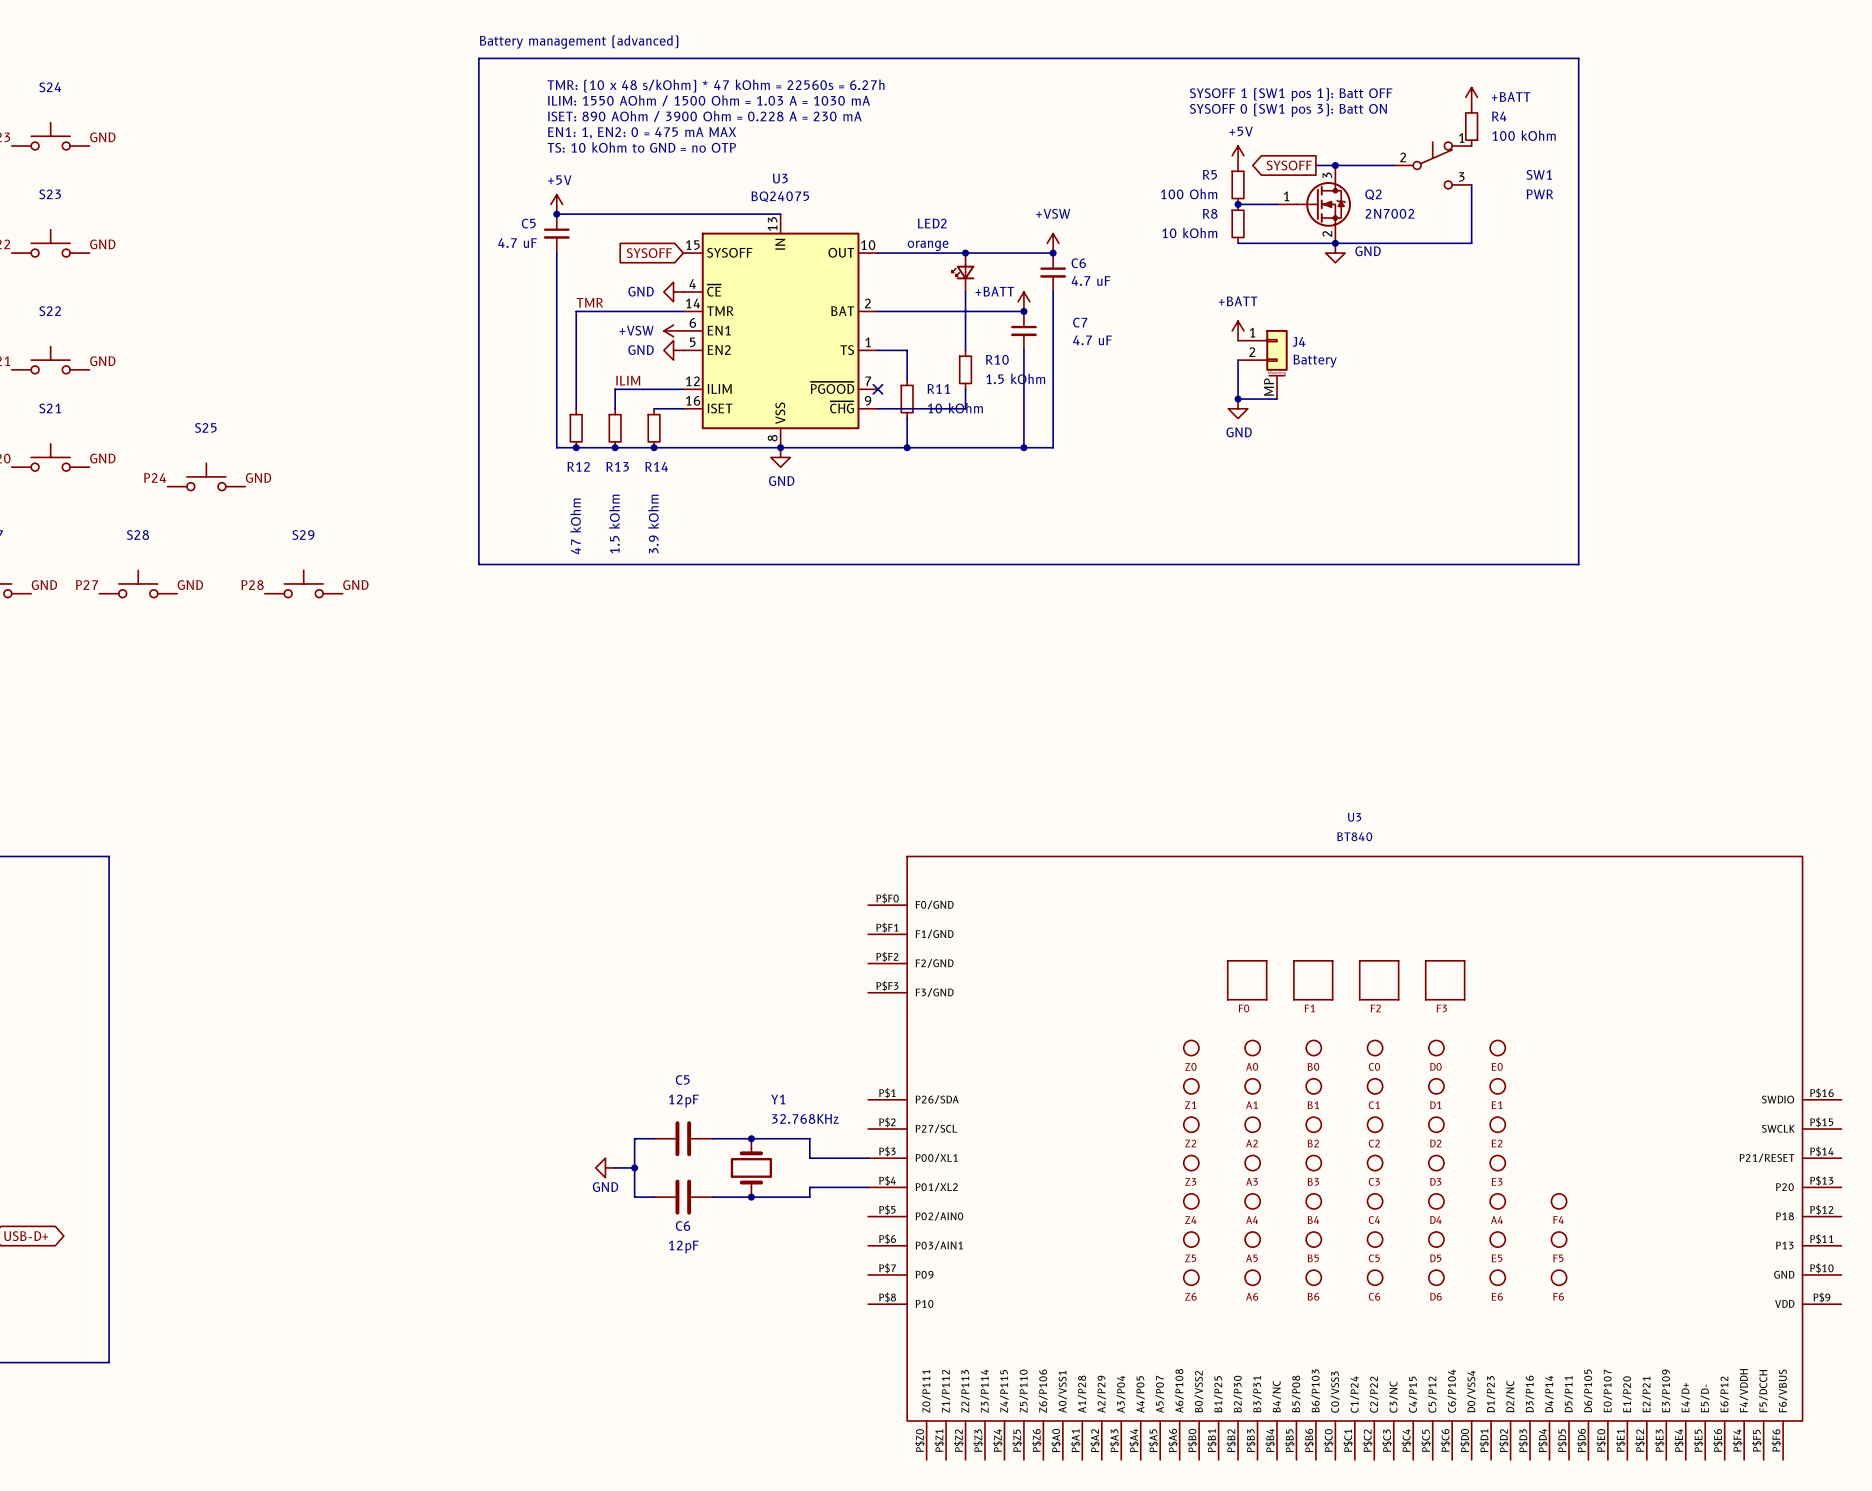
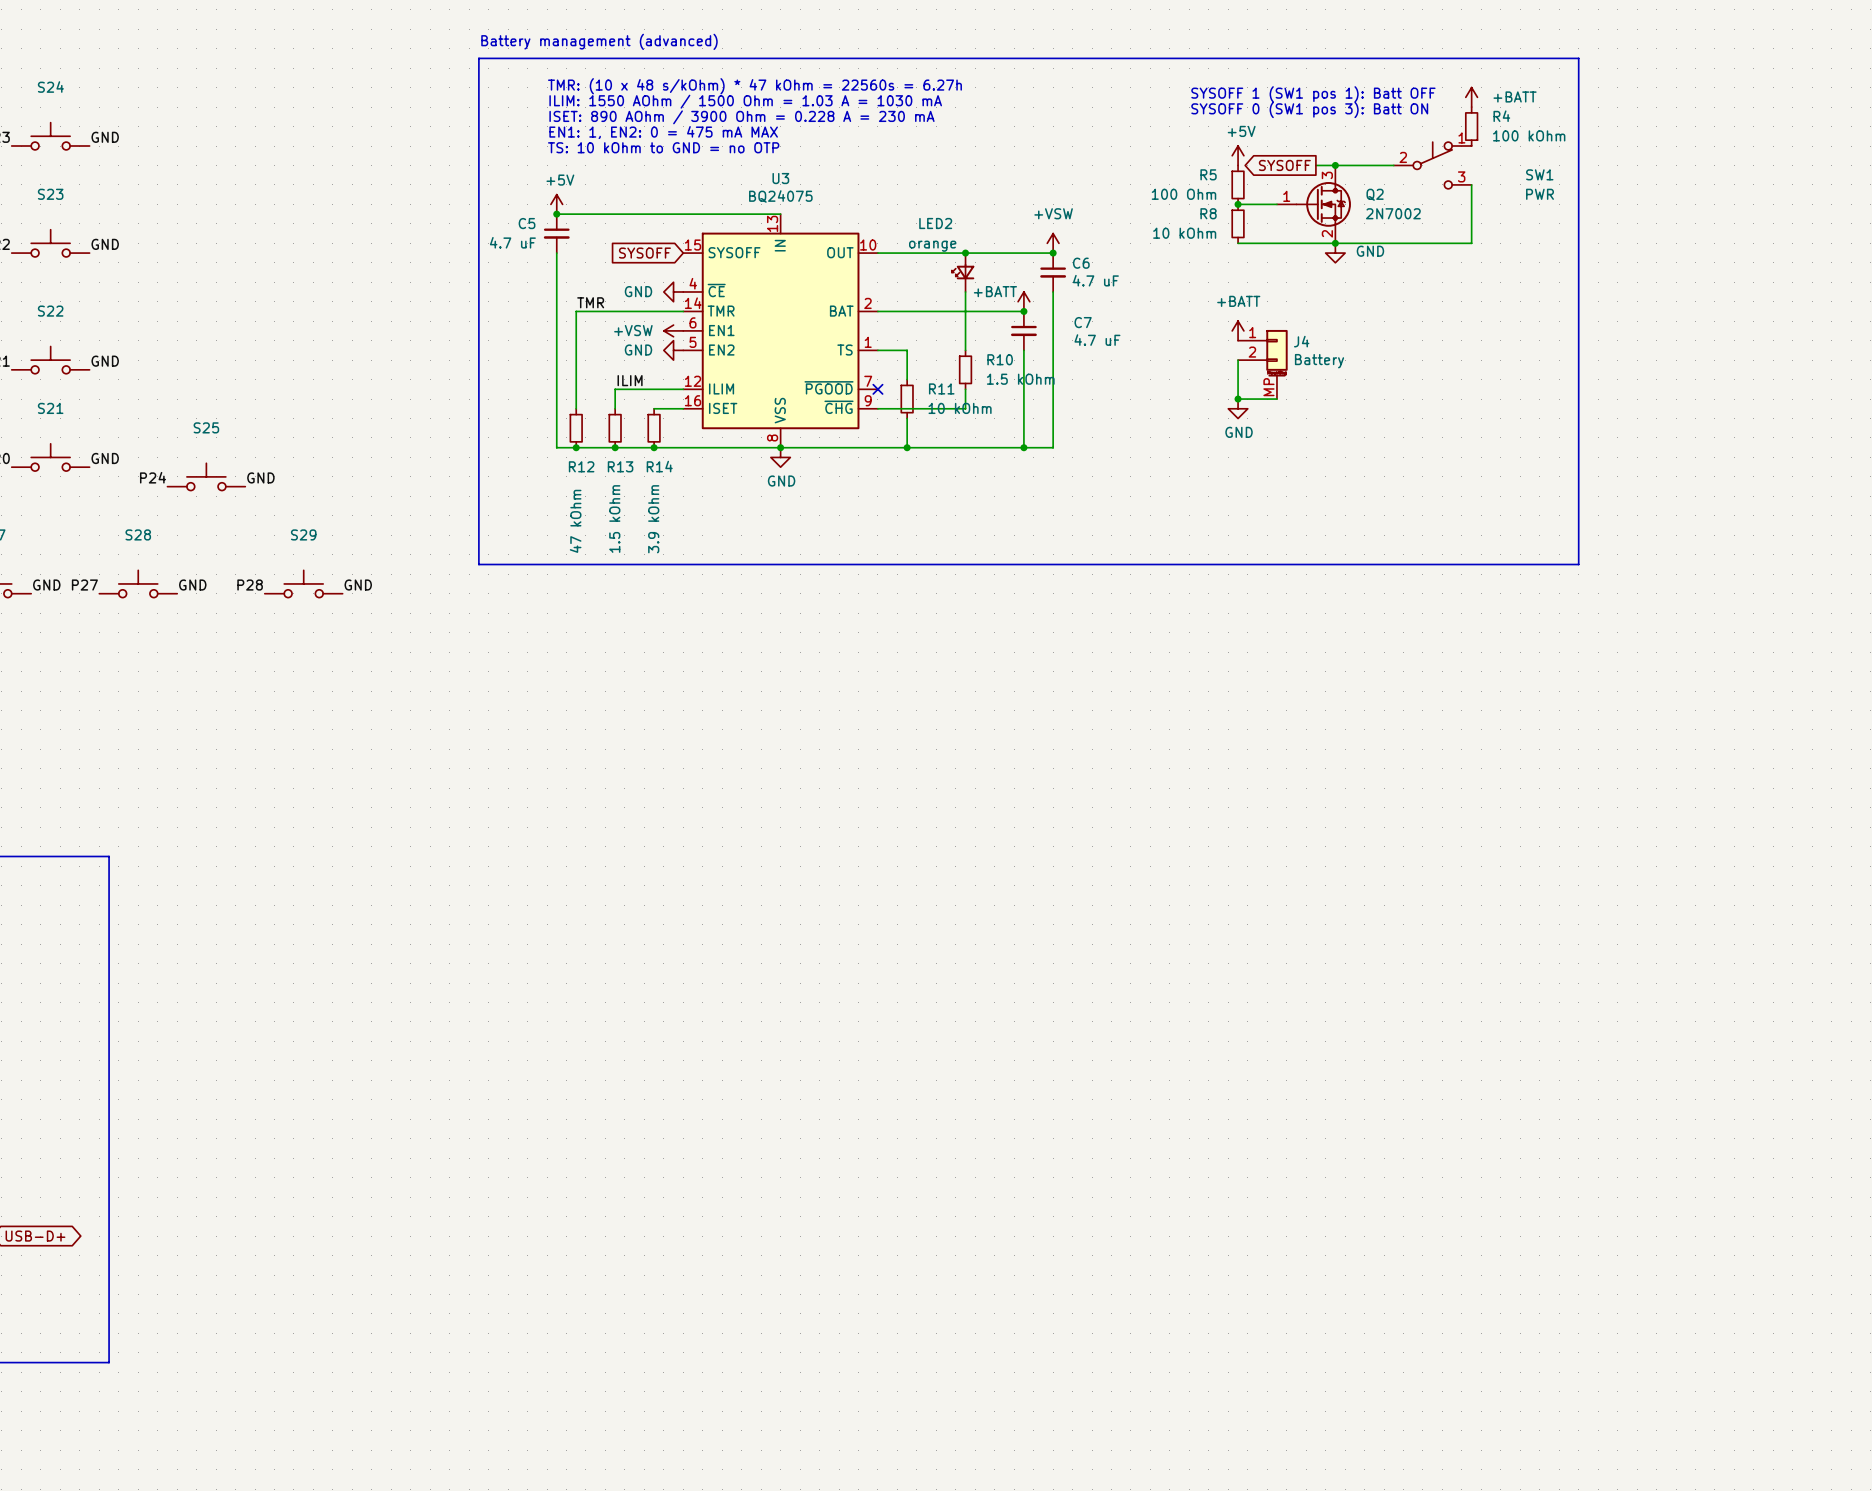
wire: (654, 1138) (634, 1138) (634, 1197) (654, 1197) -> none
C5: 12pF (683, 1138) -> none
wire: (712, 1138) (809, 1138) (809, 1158) (868, 1158) -> none
junction: (751, 1138) -> none
U3: BT840 (1354, 1158) -> none
power symbol: GND (605, 1167) -> none
wire: (615, 1167) (634, 1167) -> none
junction: (634, 1167) -> none
Y1: 32.768KHz (751, 1167) -> none
wire: (868, 1187) (809, 1187) (809, 1197) (712, 1197) -> none
C6: 12pF (683, 1197) -> none
junction: (751, 1197) -> none

